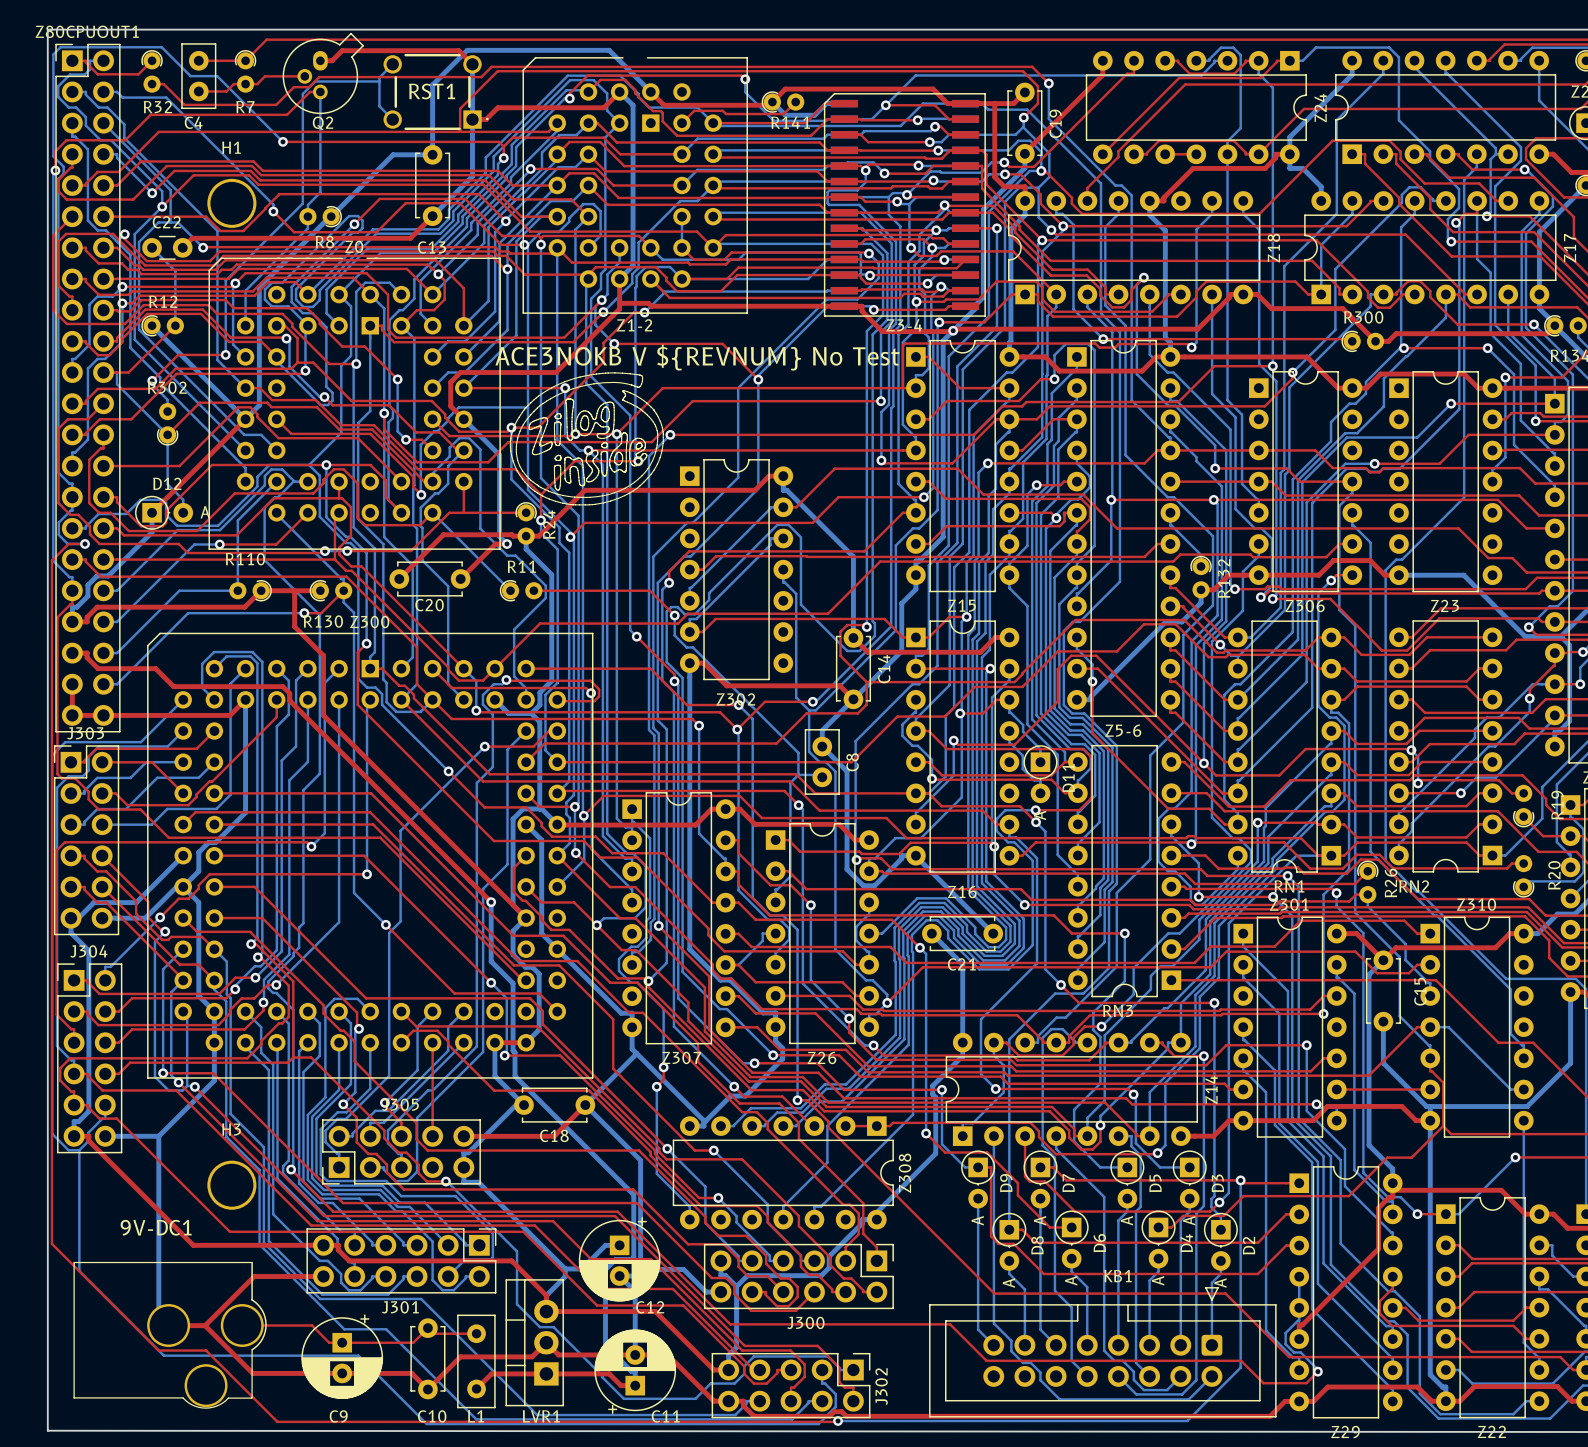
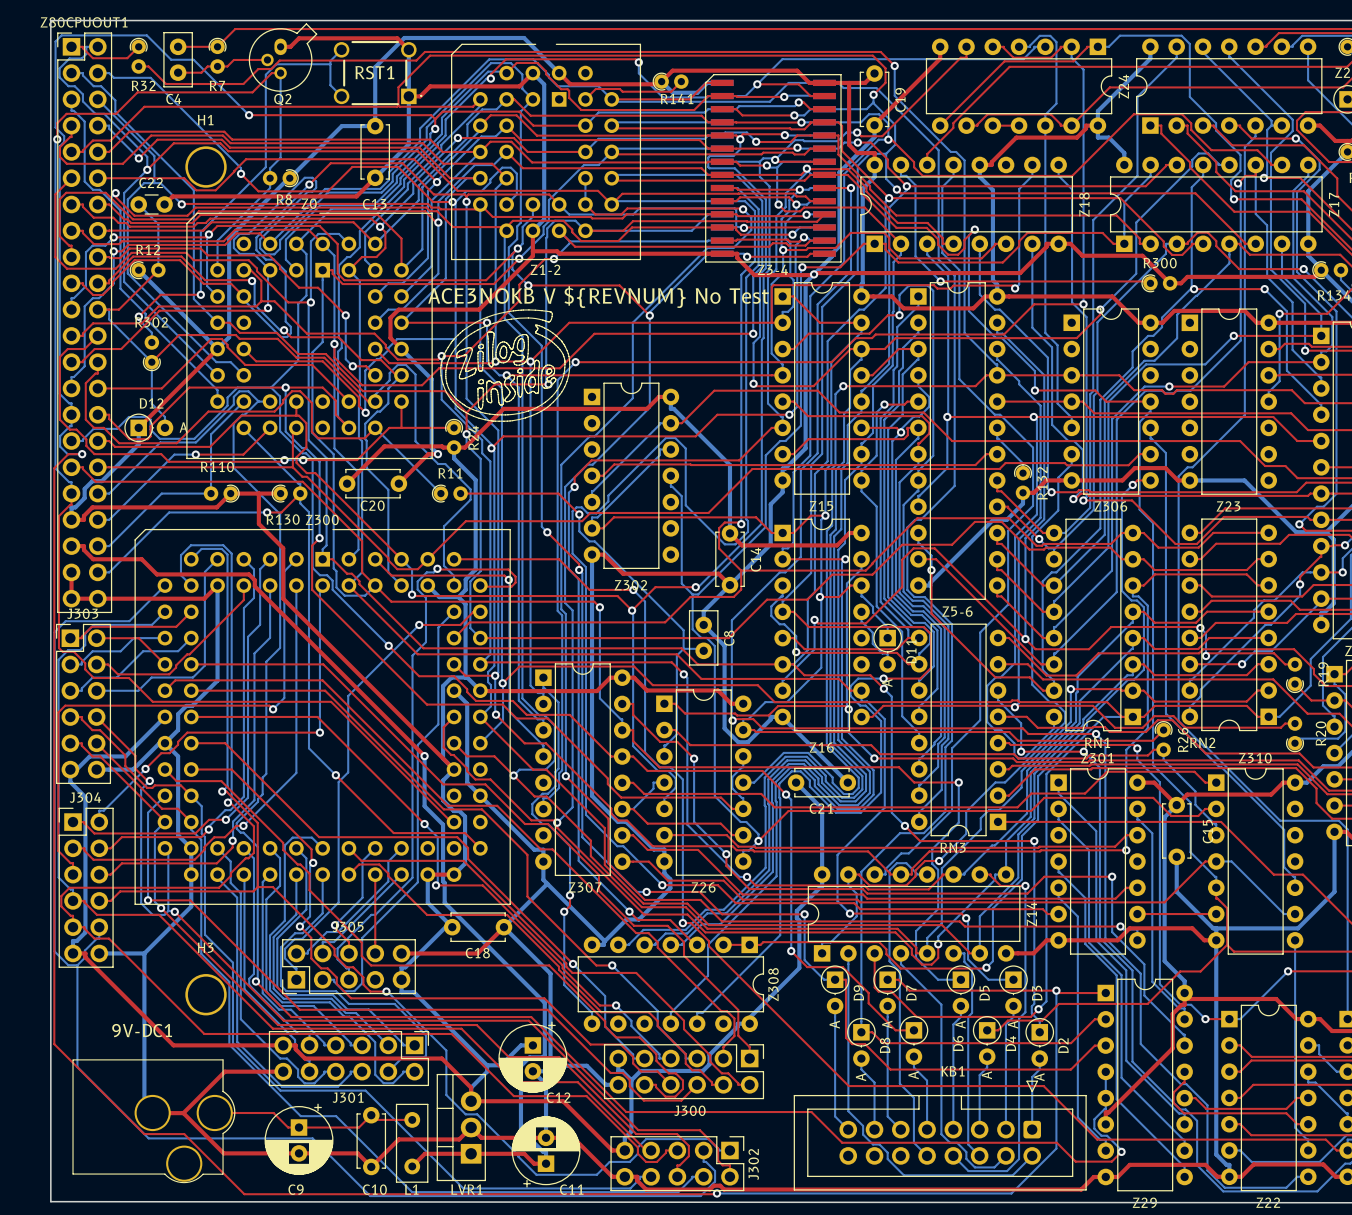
D6 name position: D6 (1099, 1243) -> D6 (958, 1043)

